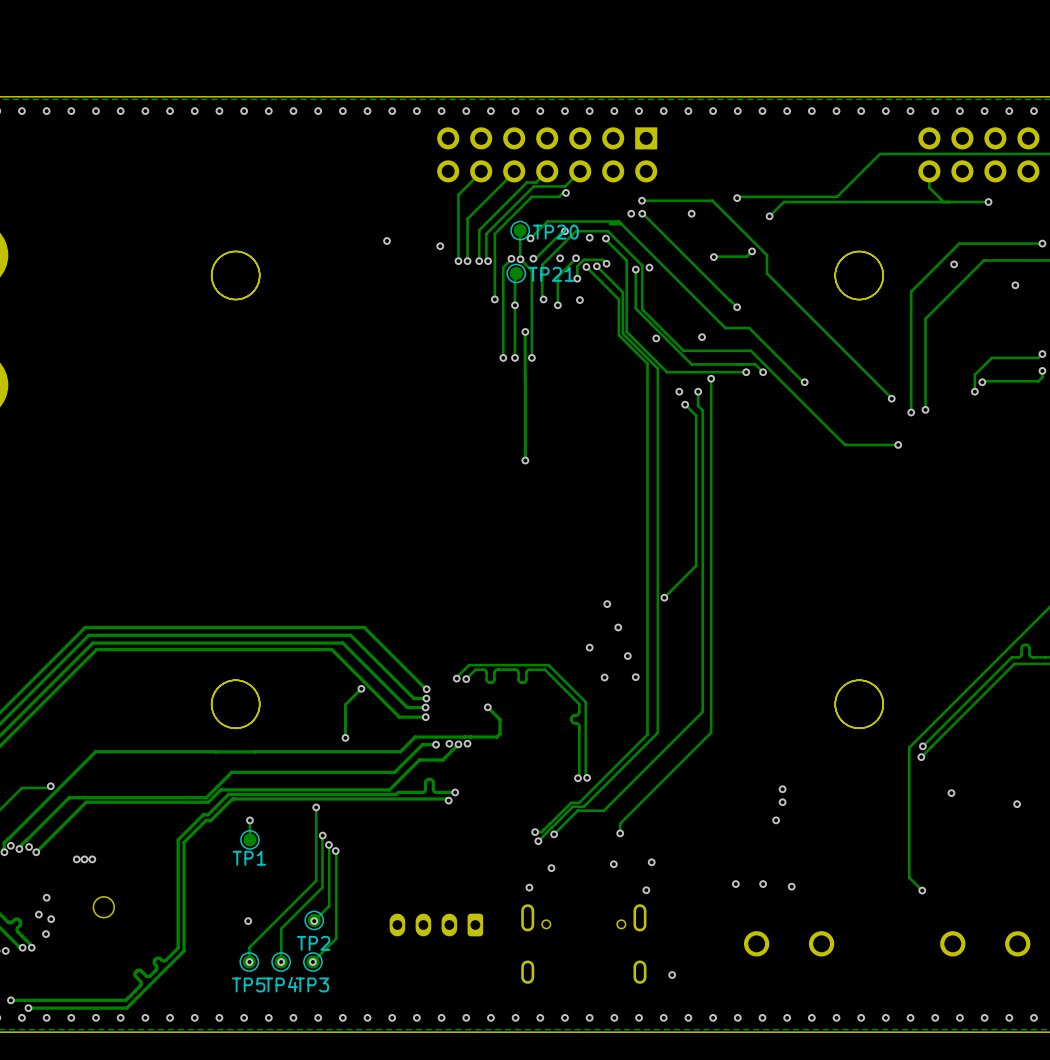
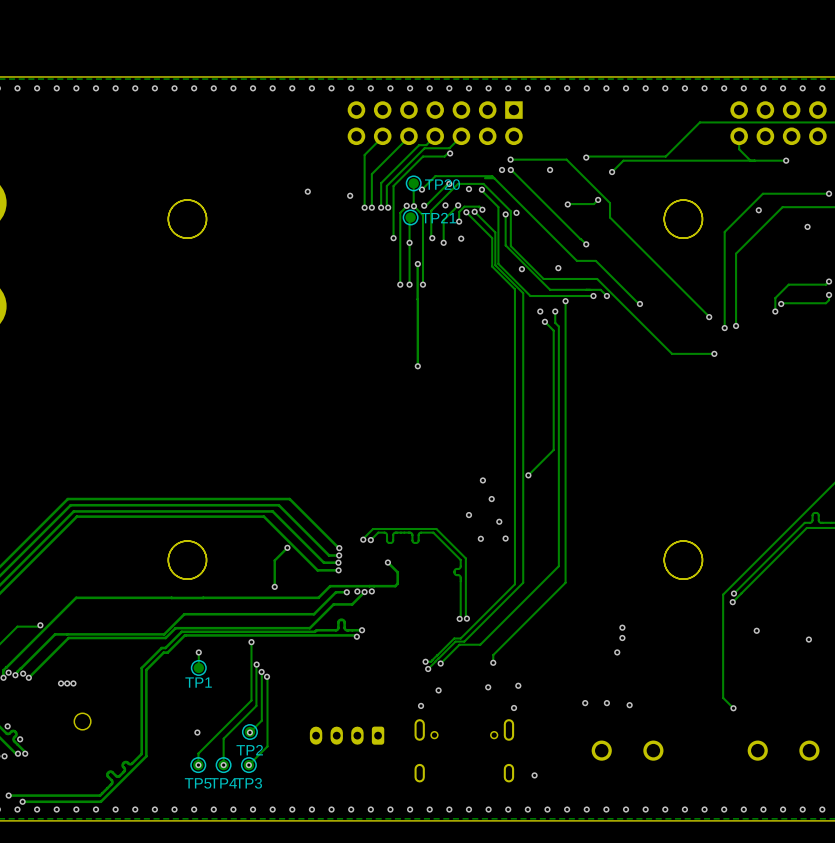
via: (46, 897) -> none
via: none -> (7, 726)
via: (38, 914) -> none
via: (51, 919) -> none
via: none -> (20, 739)
via: (46, 934) -> none

